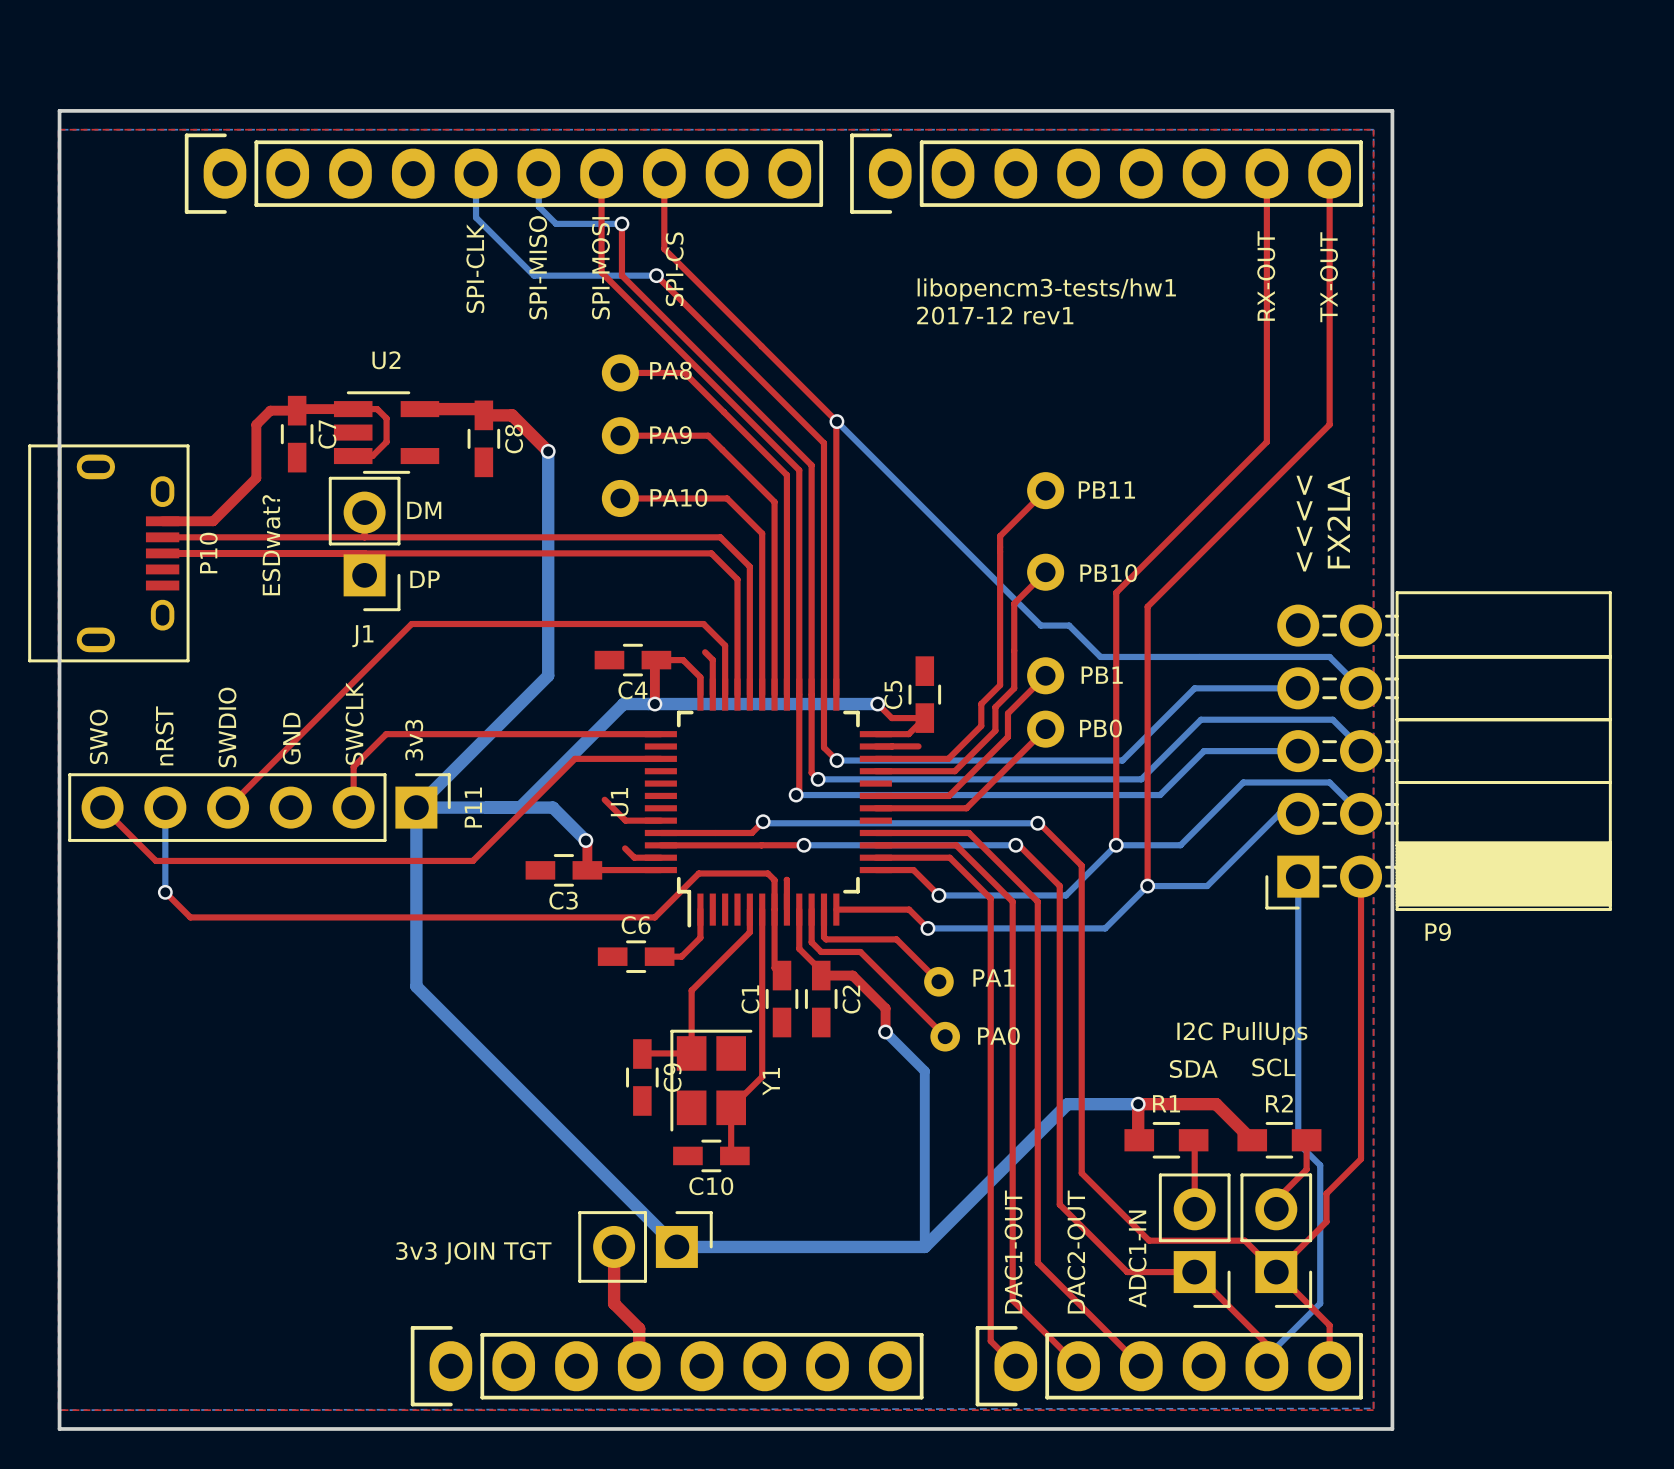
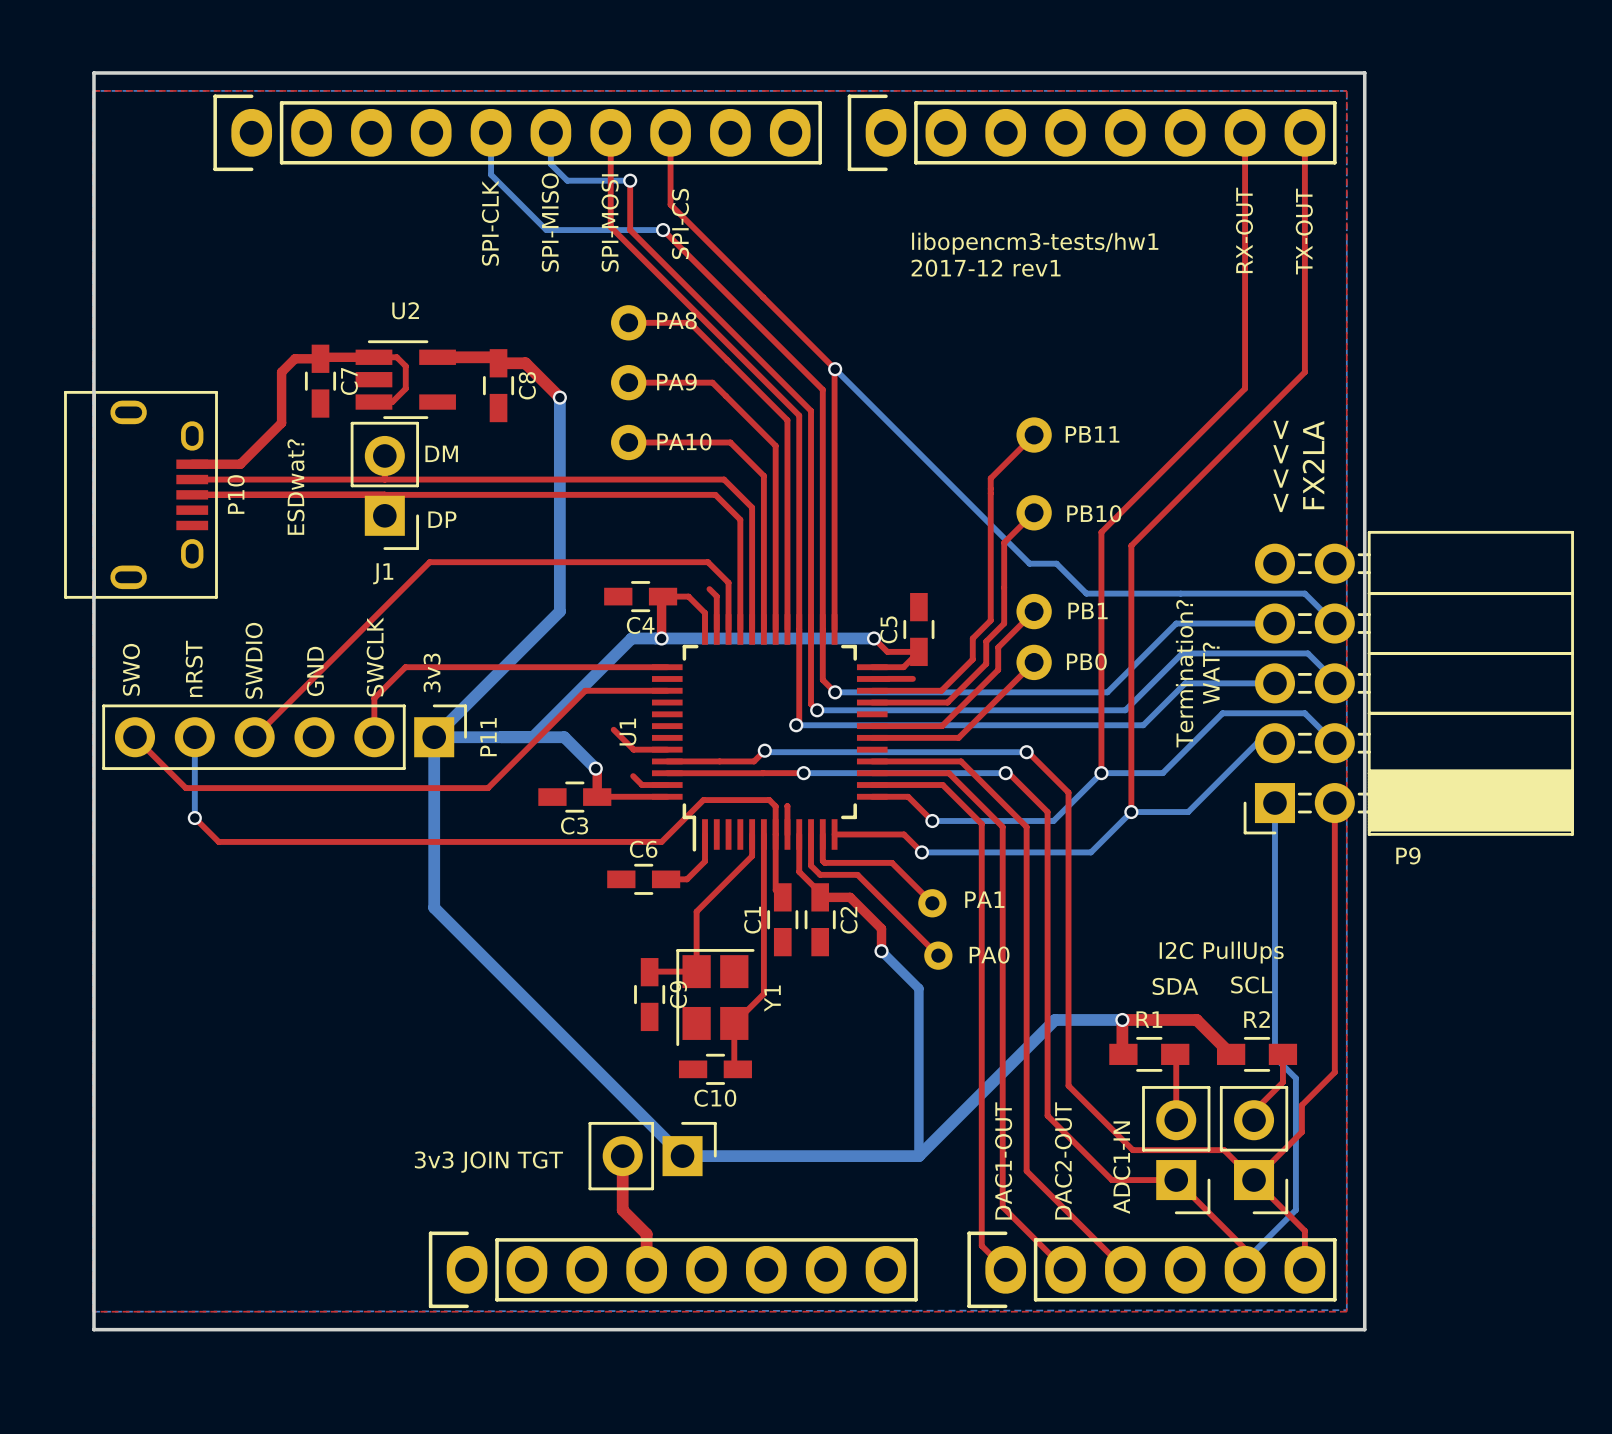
text: none -> Termination? (1184, 673)
text: none -> WAT? (1211, 673)

